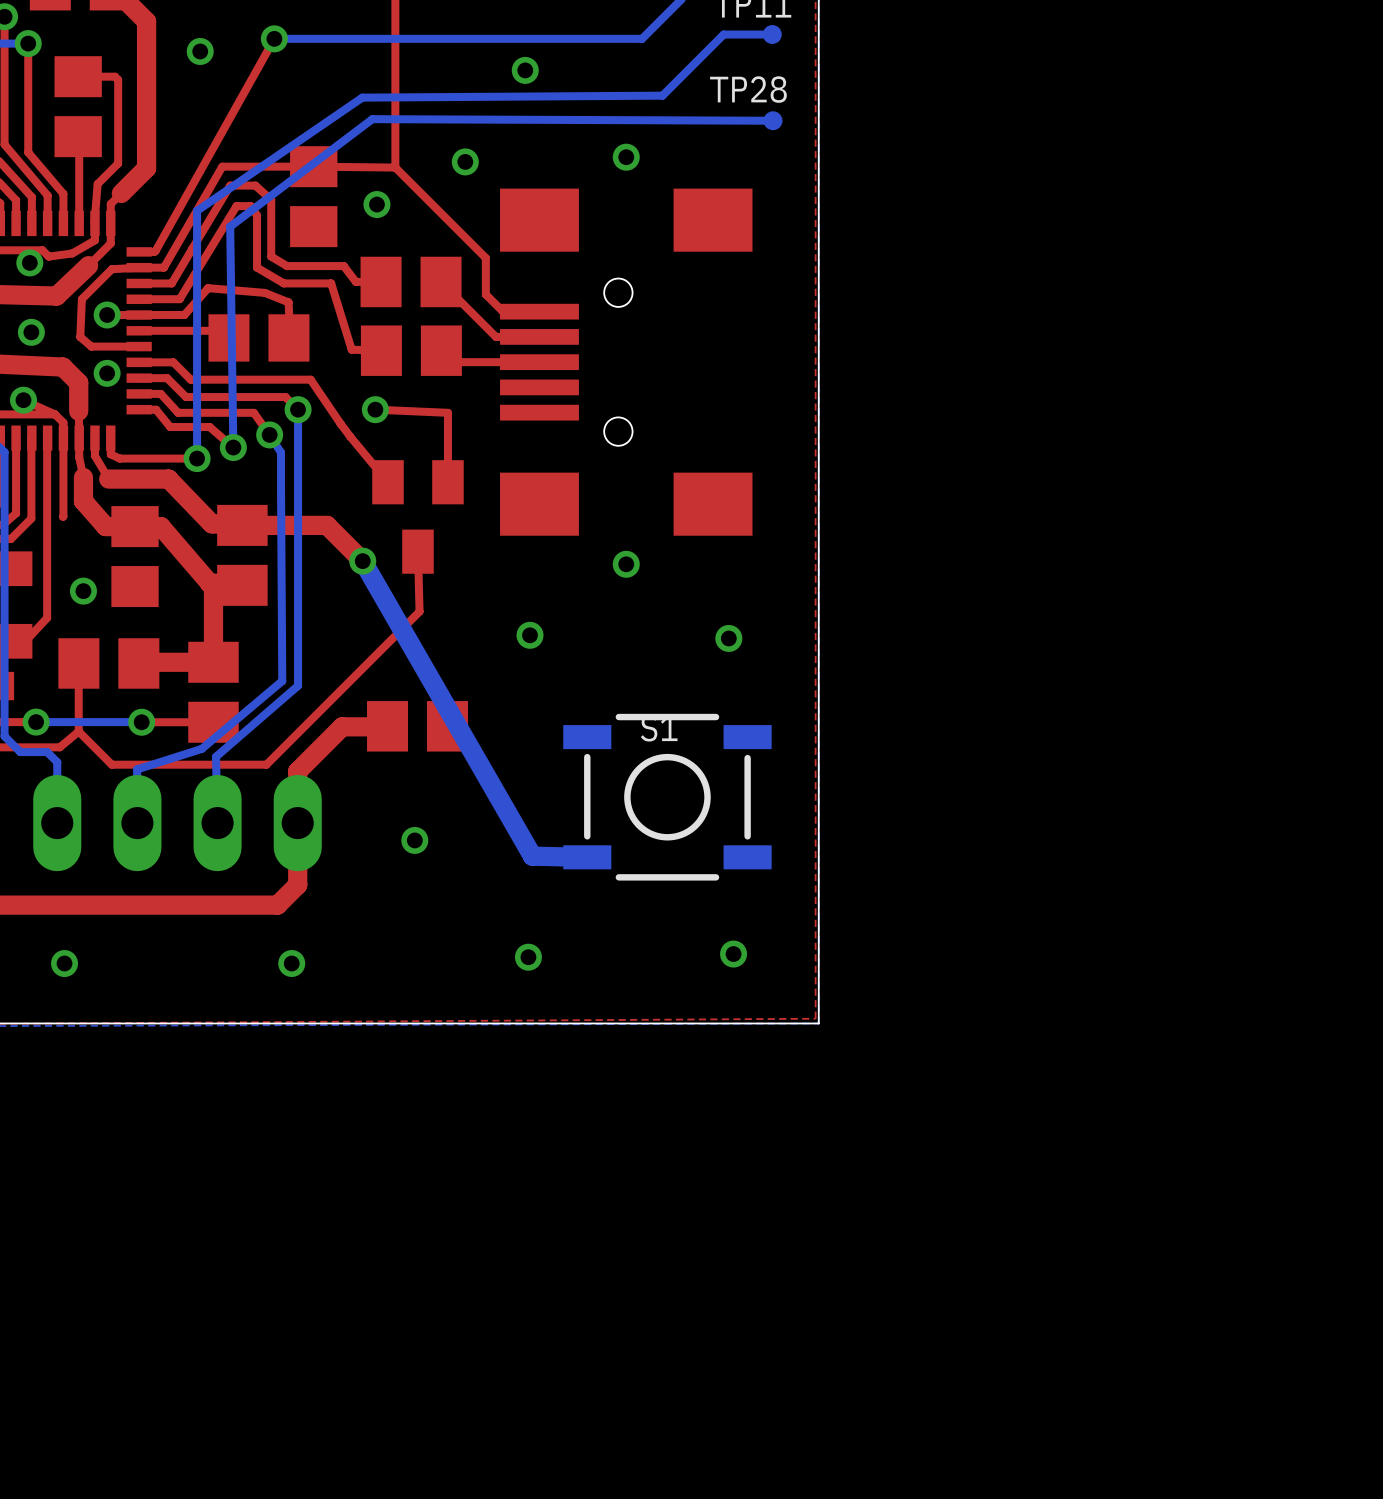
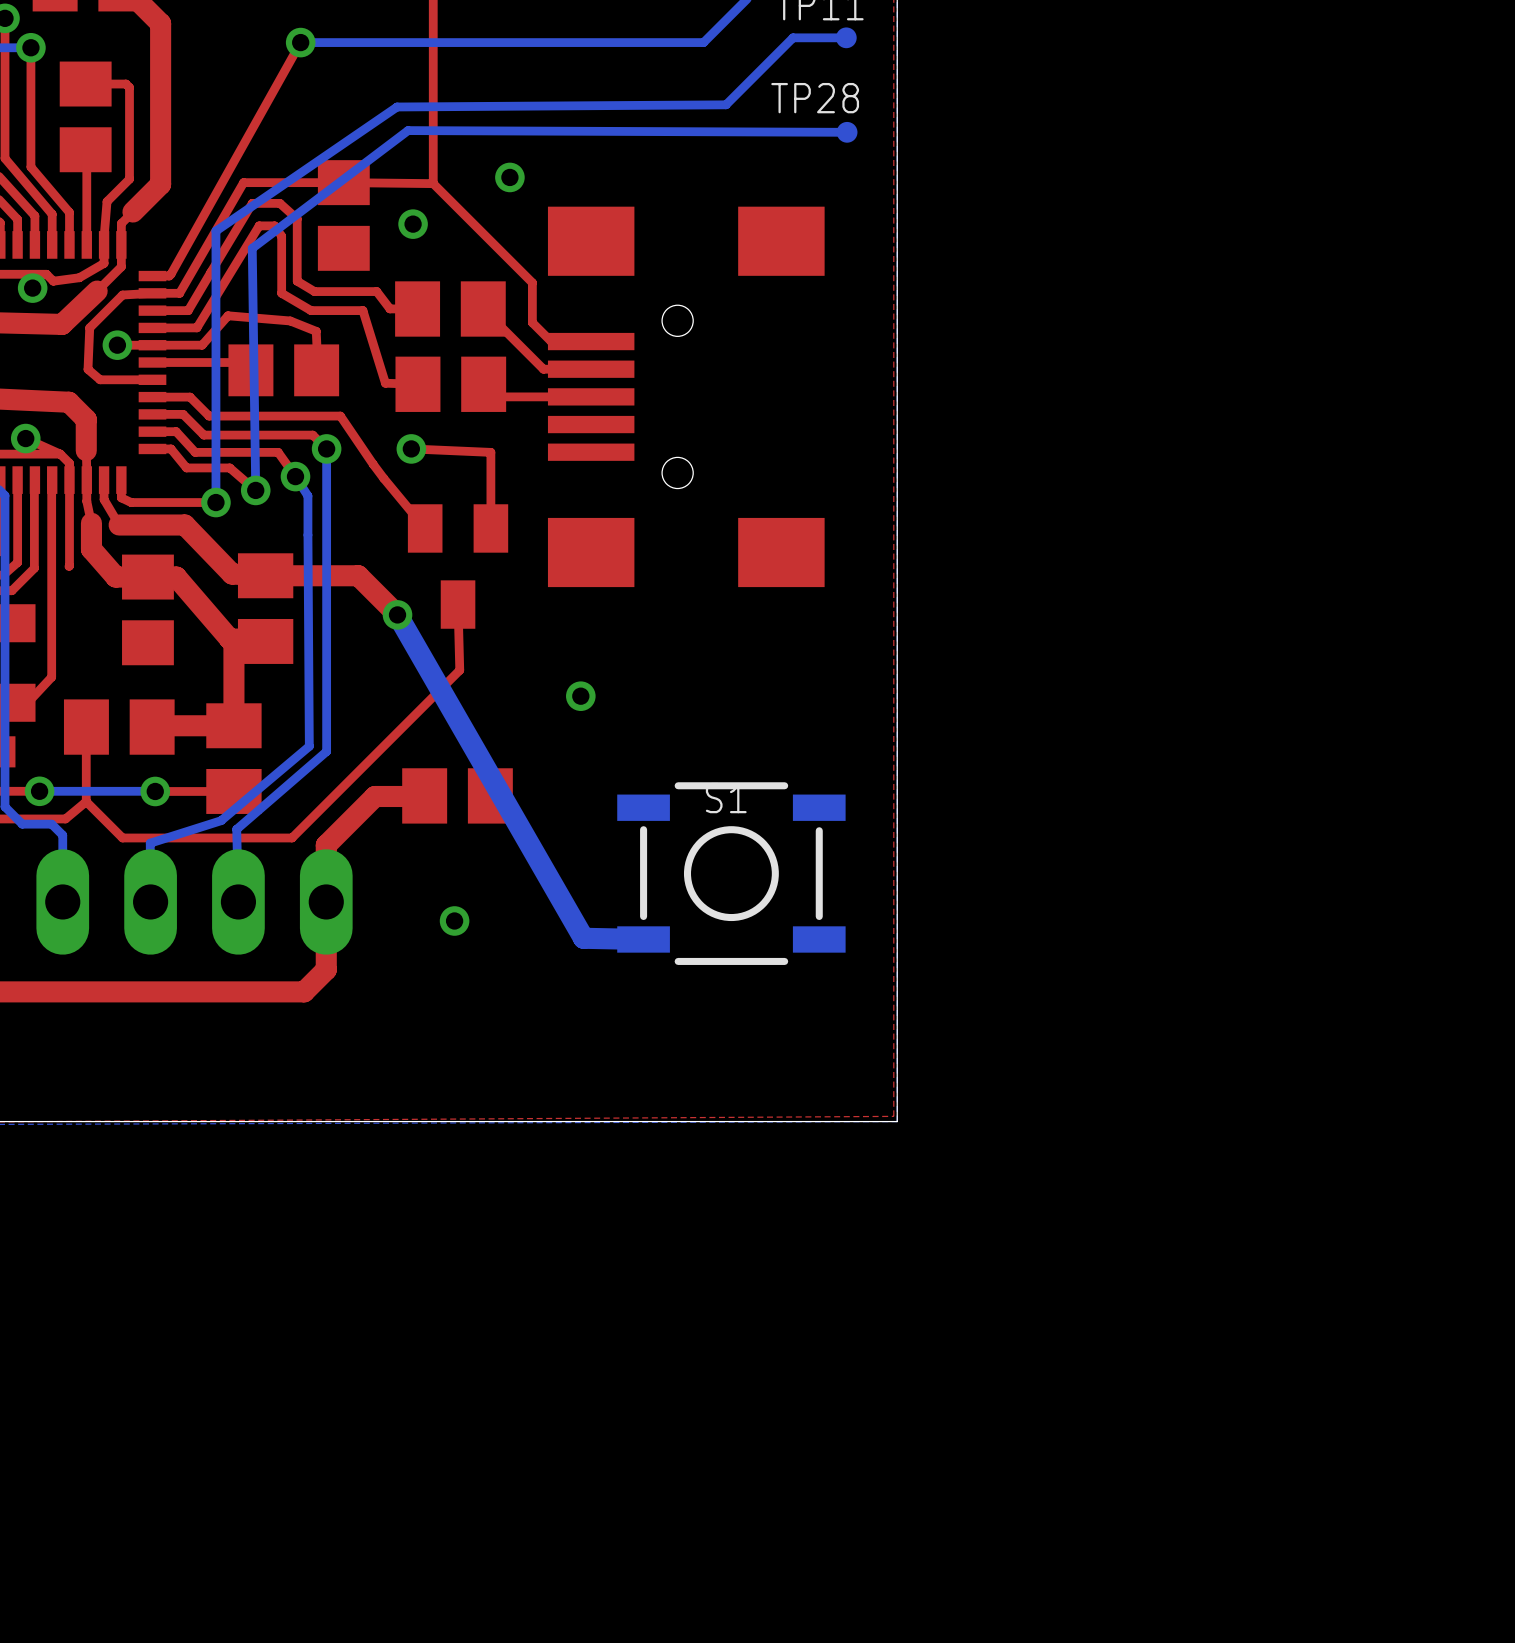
via: (200, 51) -> none
via: (525, 70) -> none
via: (626, 157) -> none
via: (31, 332) -> none
via: (107, 373) -> none
via: (626, 564) -> none
via: (83, 591) -> none
via: (728, 638) -> none
via: (733, 954) -> none
via: (528, 957) -> none
via: (64, 963) -> none
via: (291, 963) -> none

